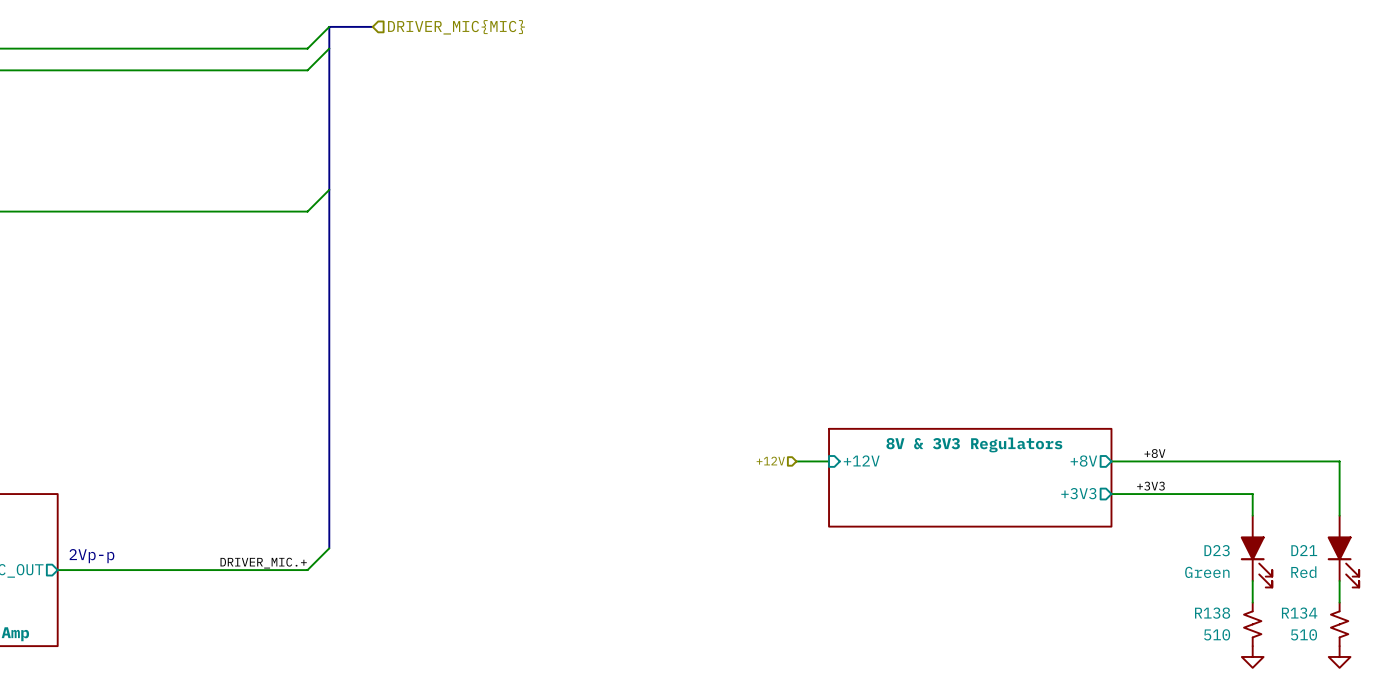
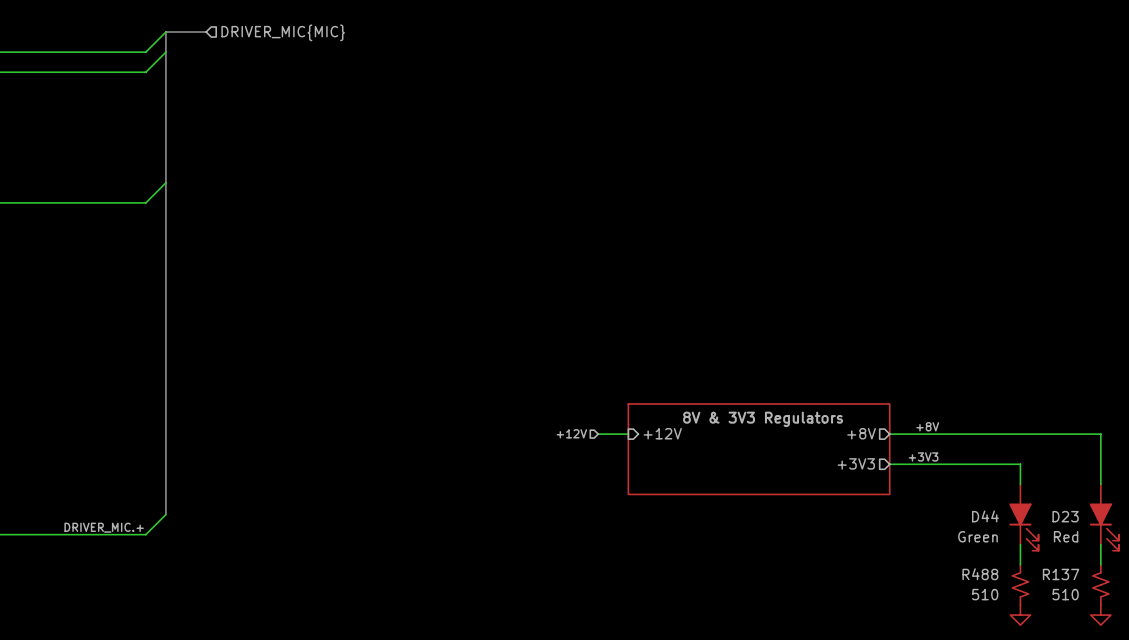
D23 name: D23 (1217, 550) -> D44 (985, 516)
D21 name: D21 (1304, 550) -> D23 (1065, 516)
R138 name: R138 (1212, 613) -> R488 (980, 574)
R134 name: R134 (1299, 613) -> R137 (1061, 574)

